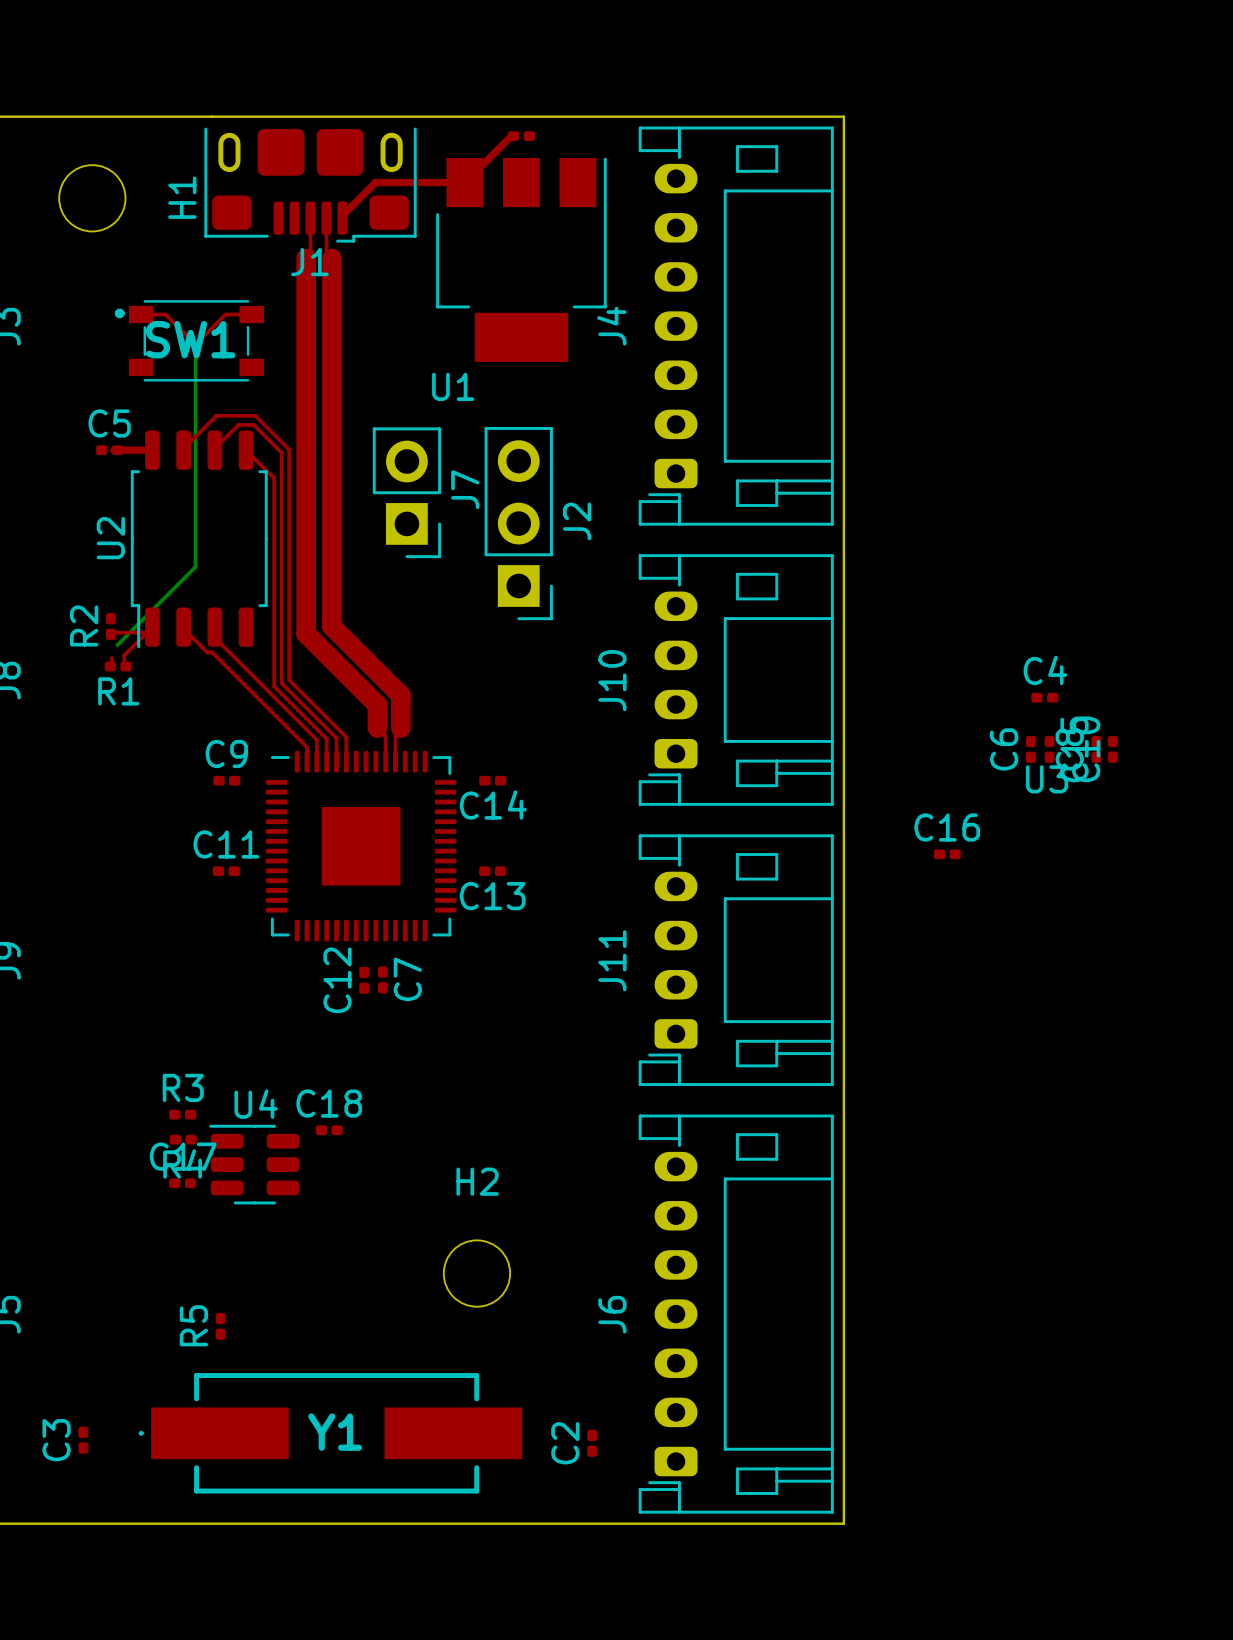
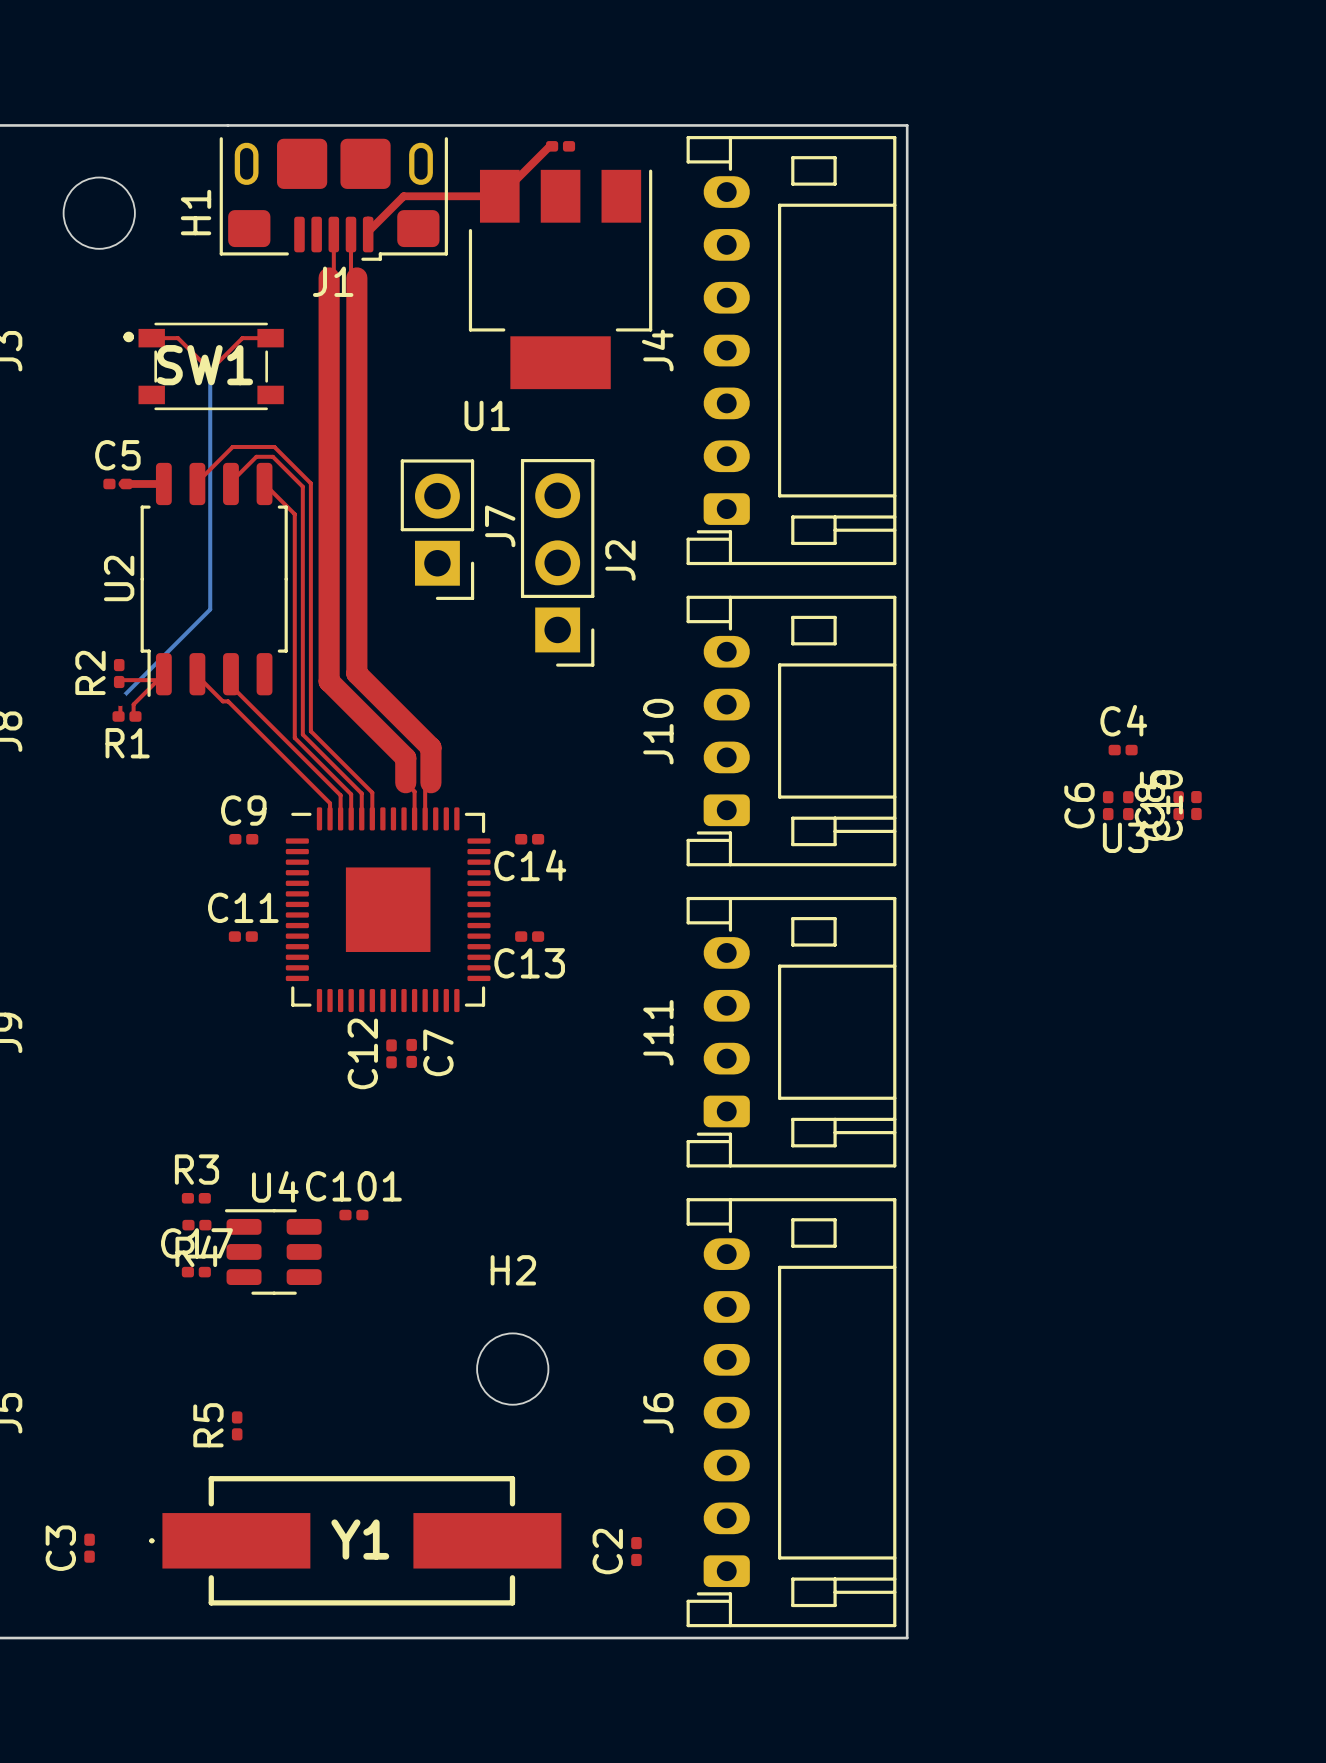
C16: (947, 854) -> none
C18 name: C18 (329, 1103) -> C101 (353, 1186)

